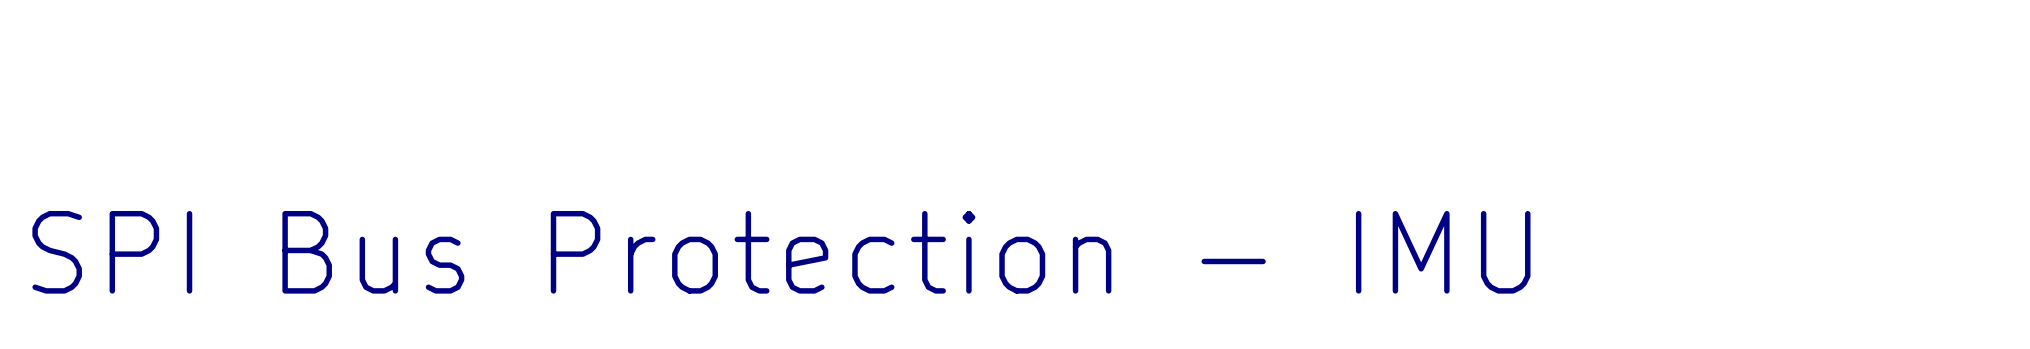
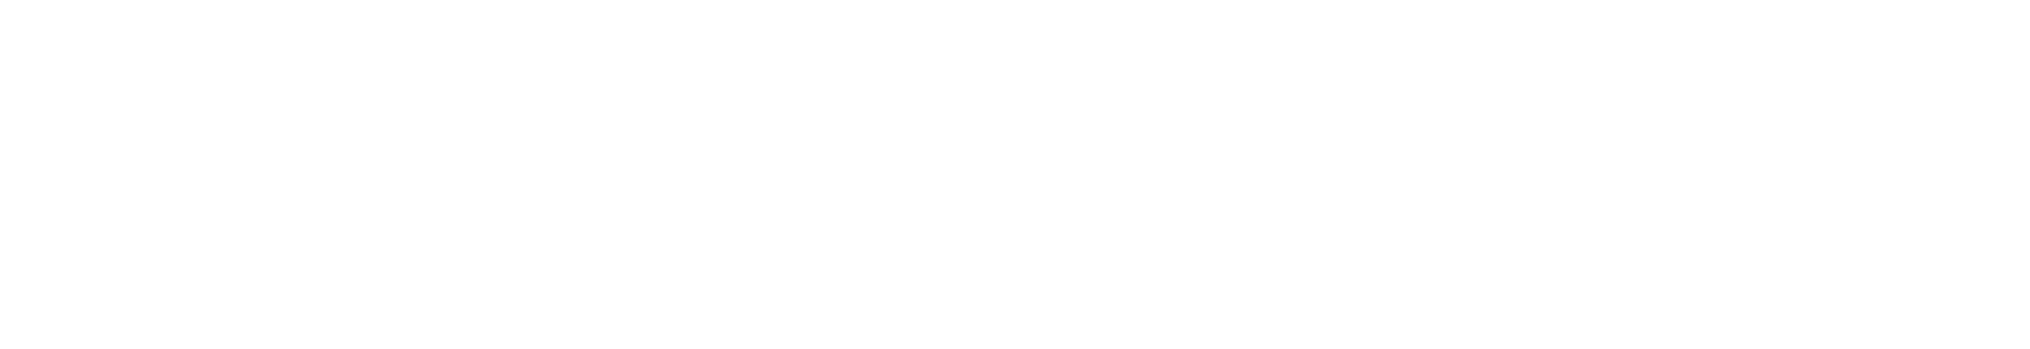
text: SPI Bus Protection - IMU (781, 252) -> none

